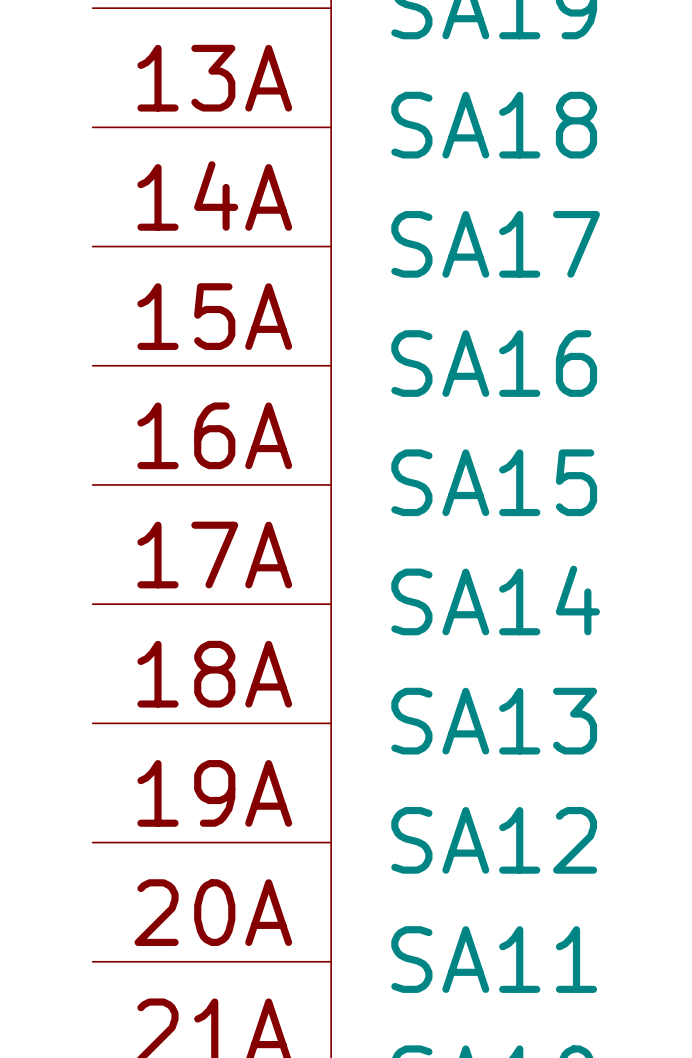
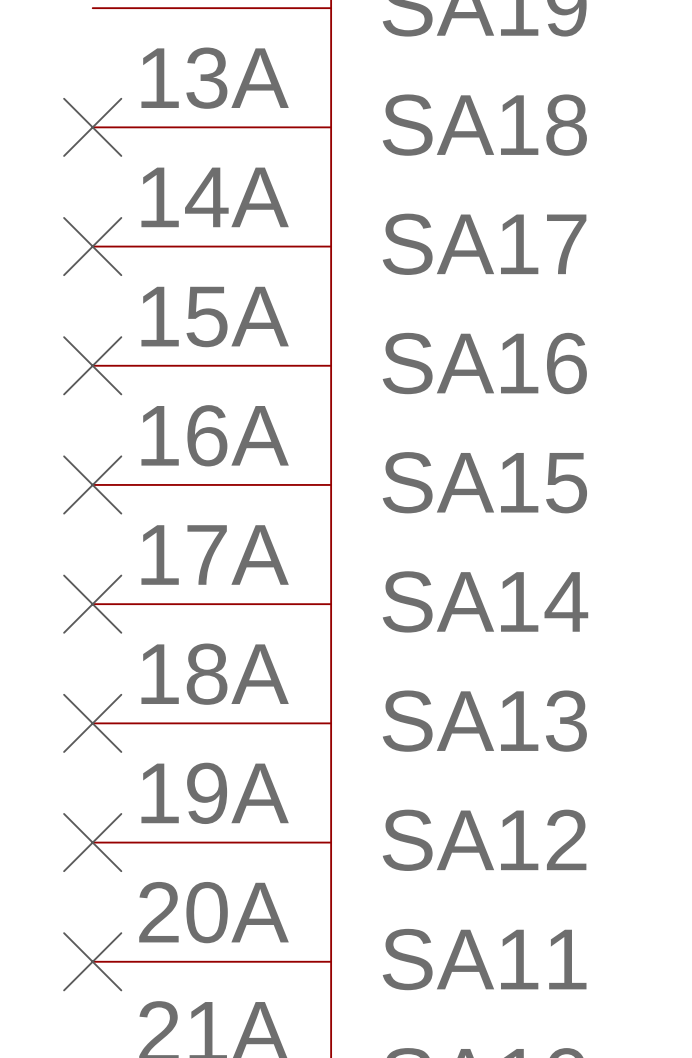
no-connect mark: none -> (92, 127)
no-connect mark: none -> (92, 246)
no-connect mark: none -> (92, 365)
no-connect mark: none -> (92, 484)
no-connect mark: none -> (92, 604)
no-connect mark: none -> (92, 723)
no-connect mark: none -> (92, 842)
no-connect mark: none -> (92, 961)

